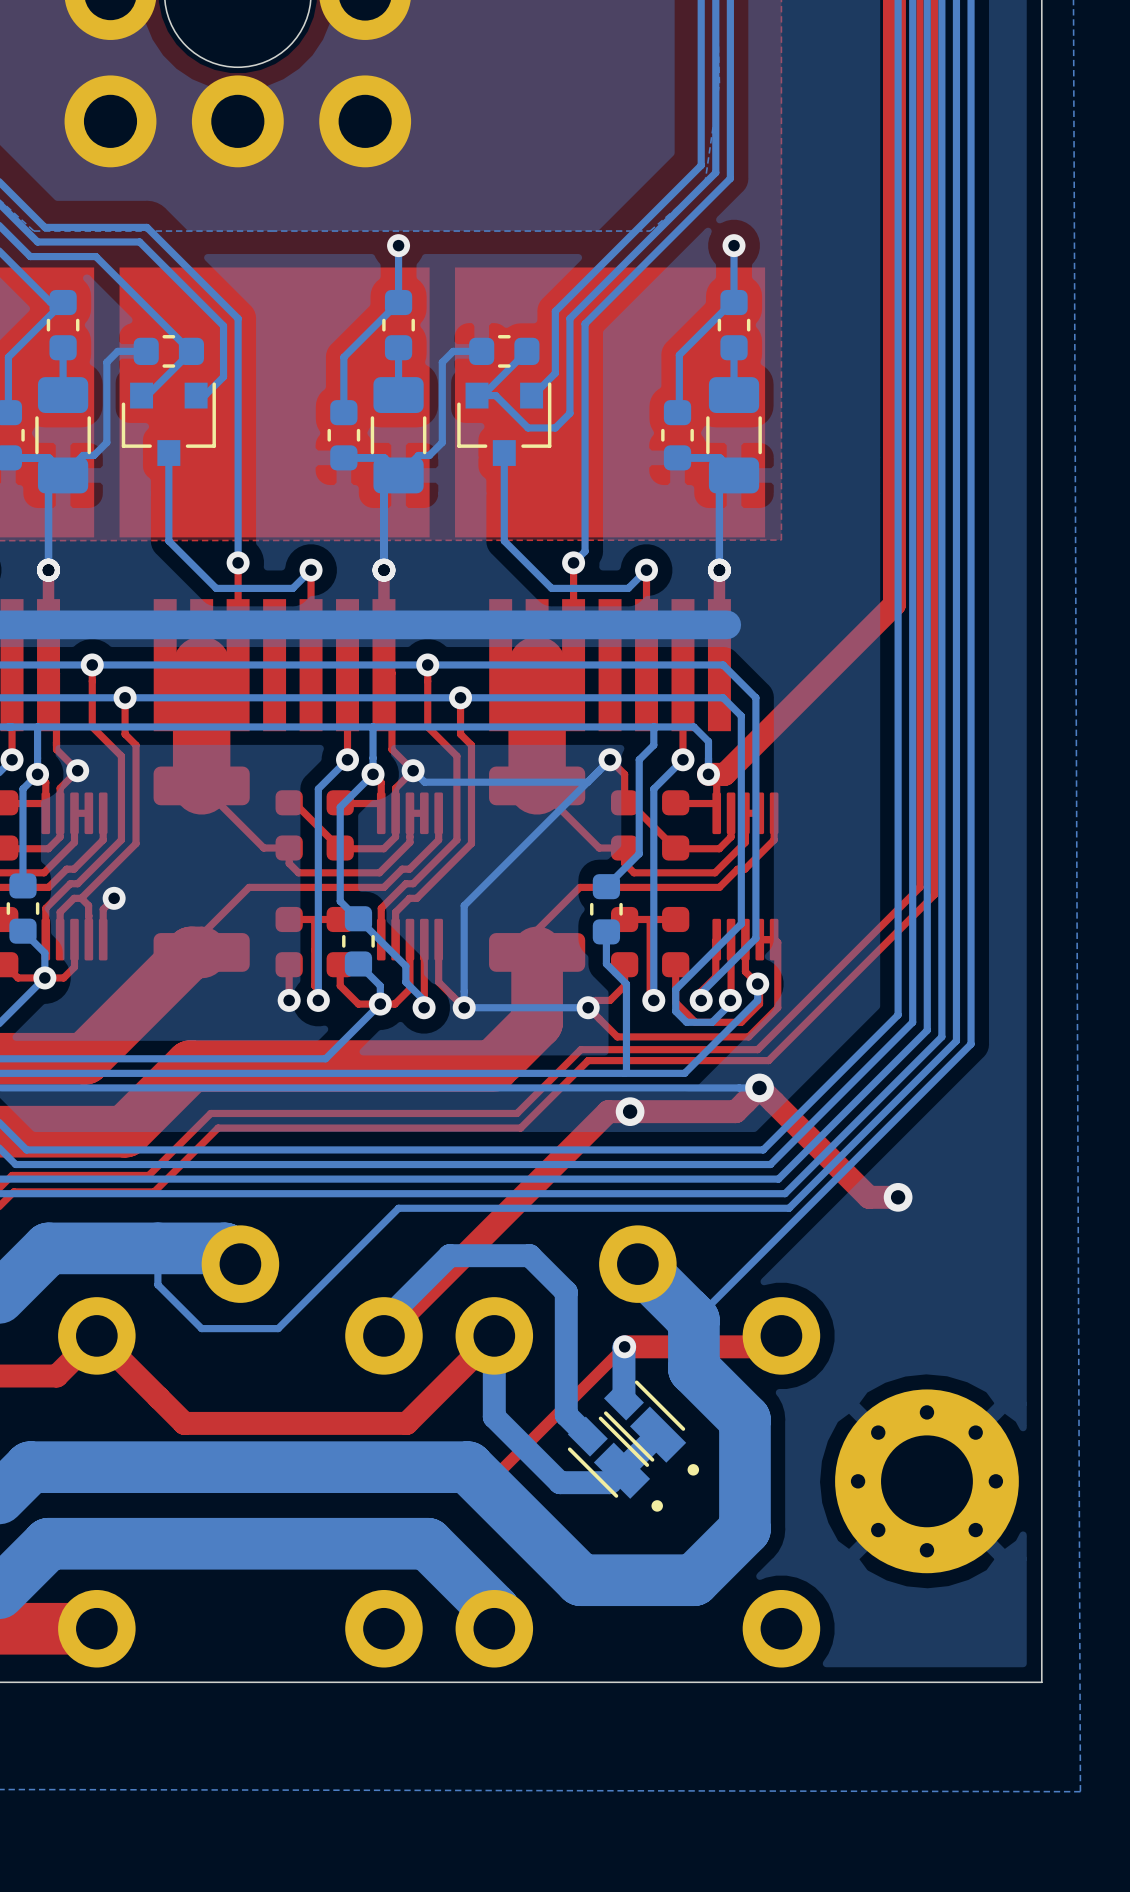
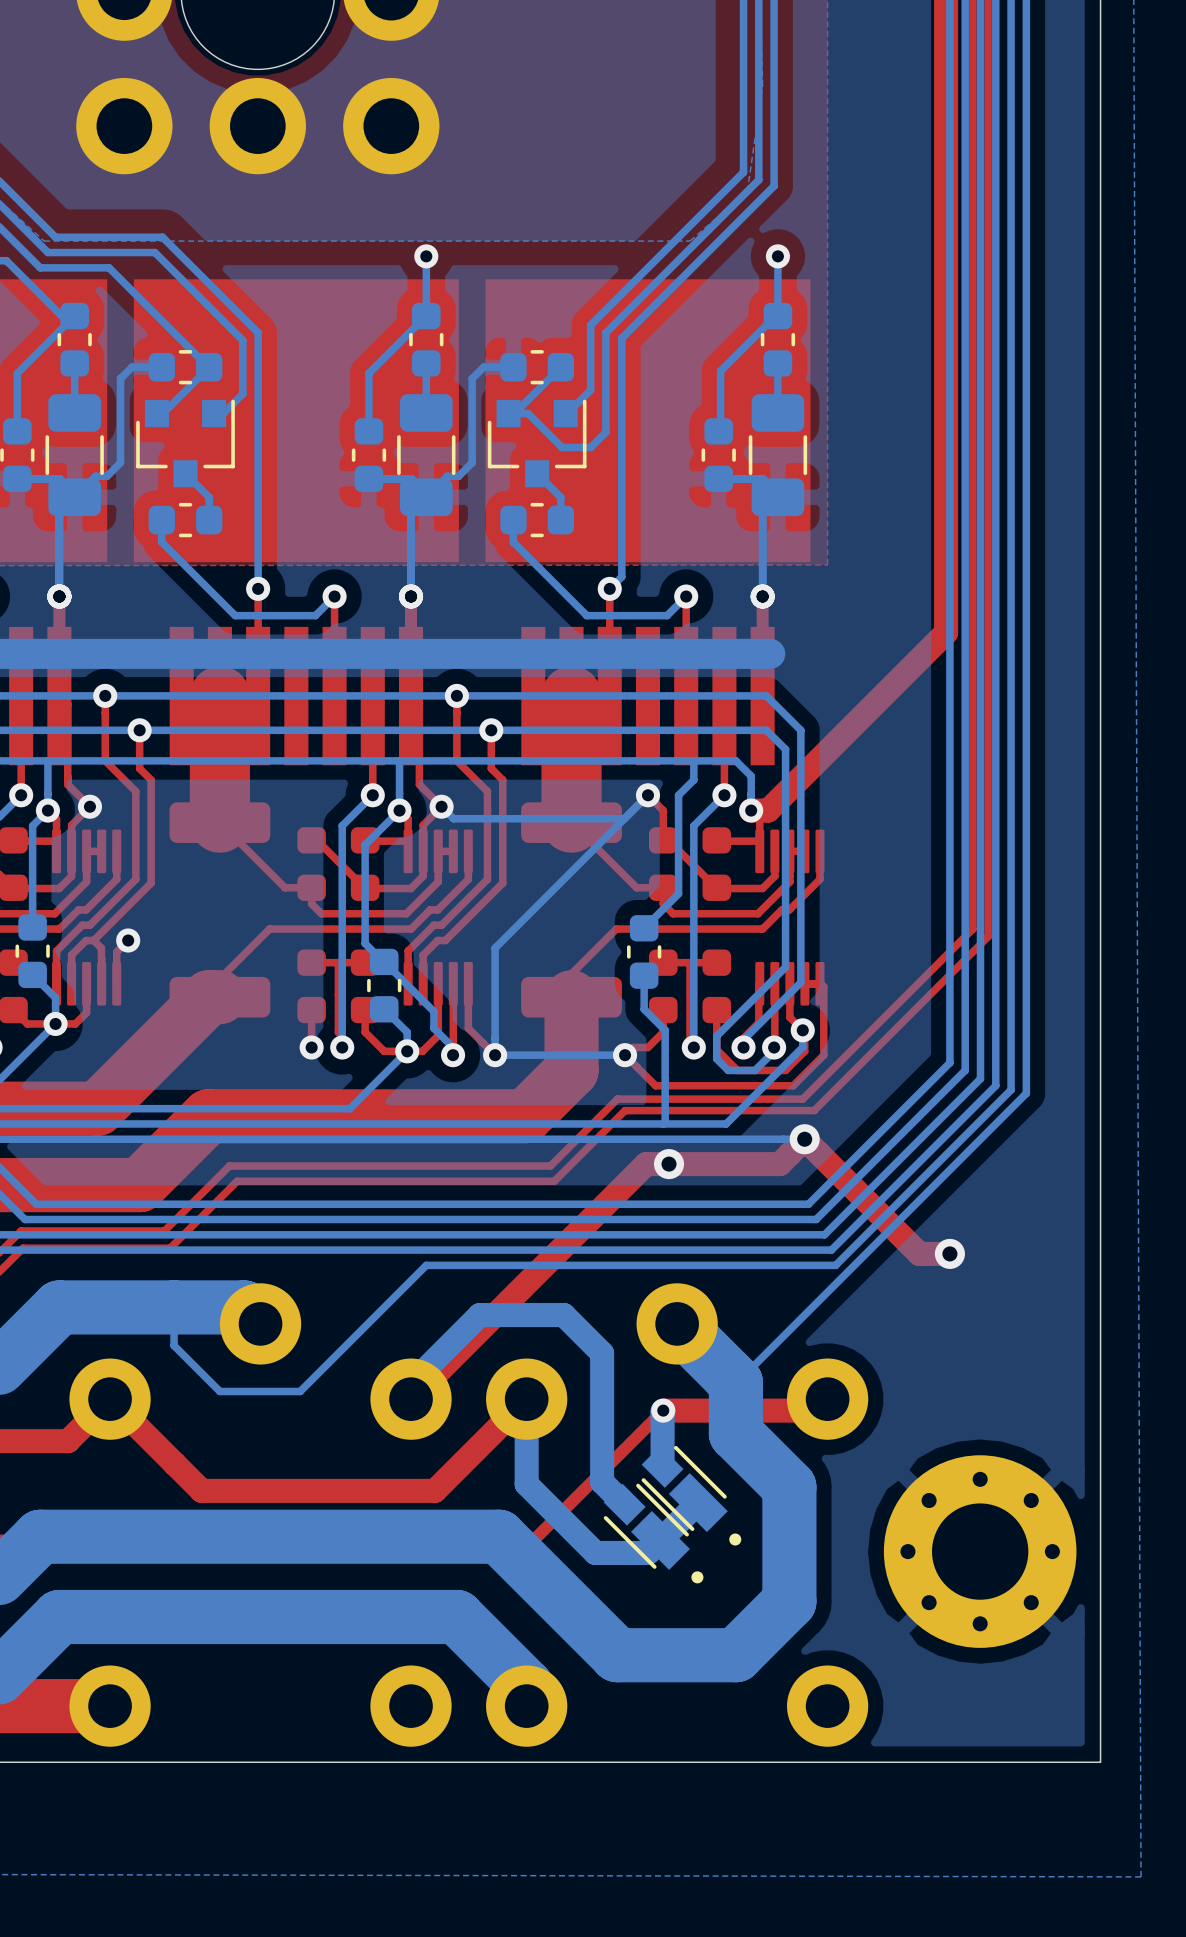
bottom track: (168, 453) (168, 540) -> (161, 520) (161, 542) (185, 565)
bottom track: none -> (185, 473) (209, 497) (209, 520)
bottom track: (504, 453) (504, 540) -> (513, 520) (513, 542) (537, 565)
bottom track: none -> (537, 473) (560, 497) (560, 520)
part: none -> (185, 520)
part: none -> (537, 520)

